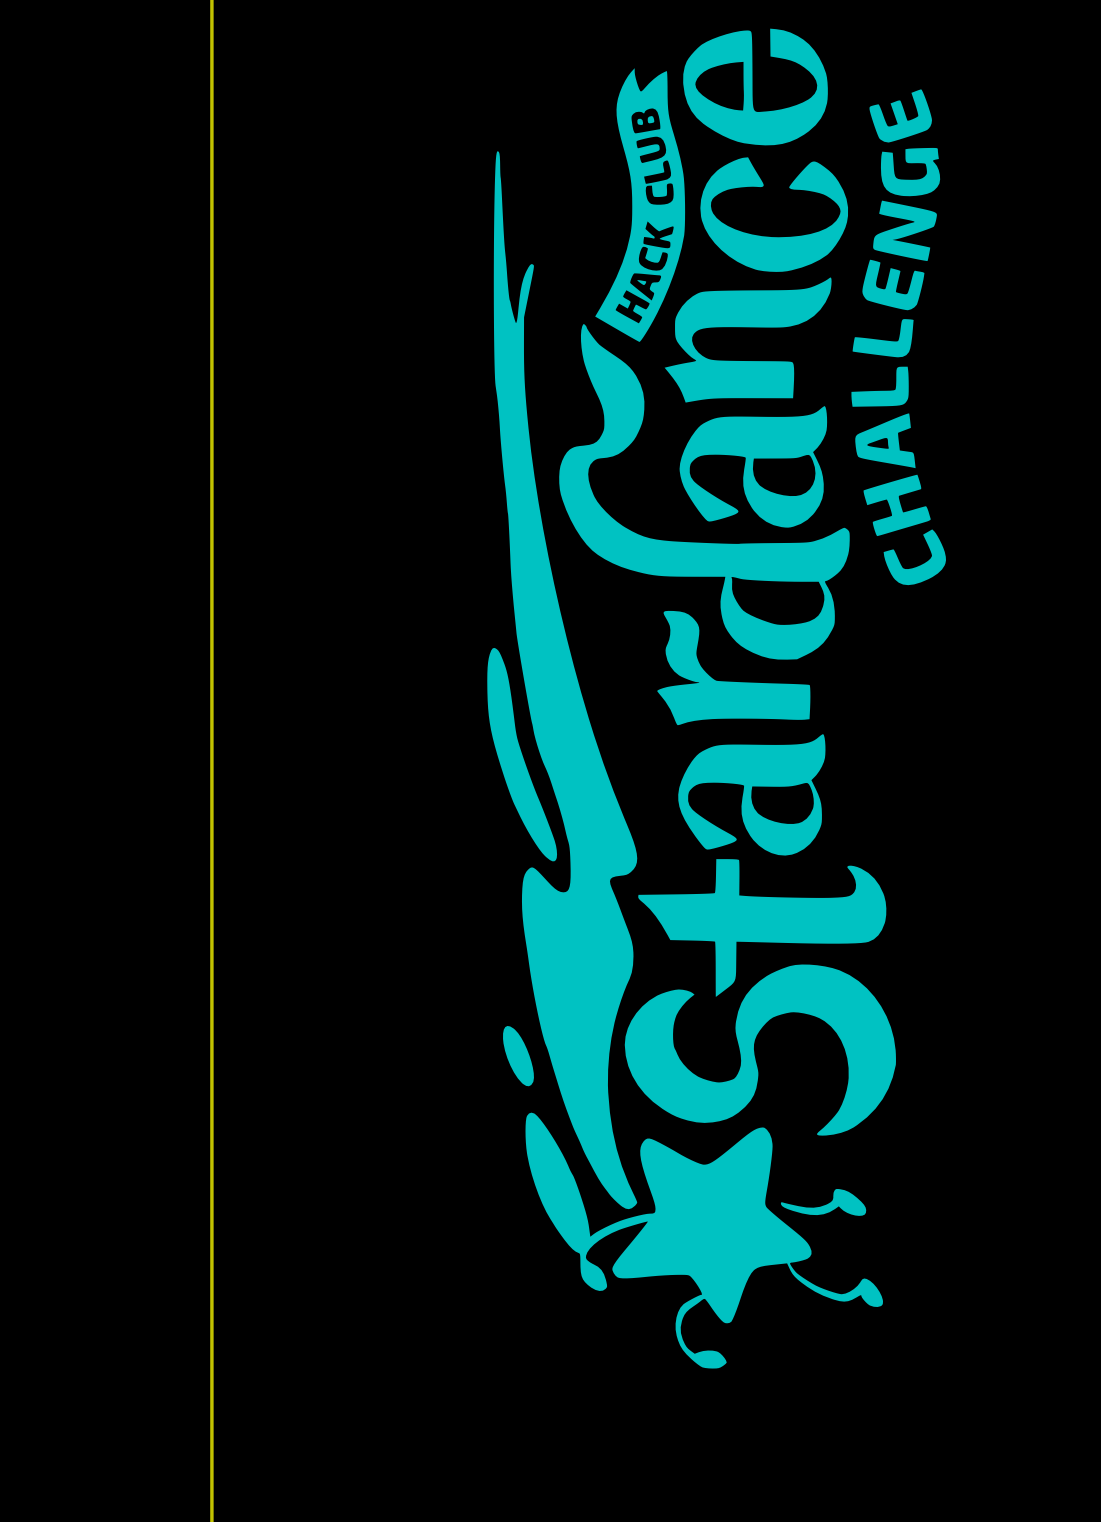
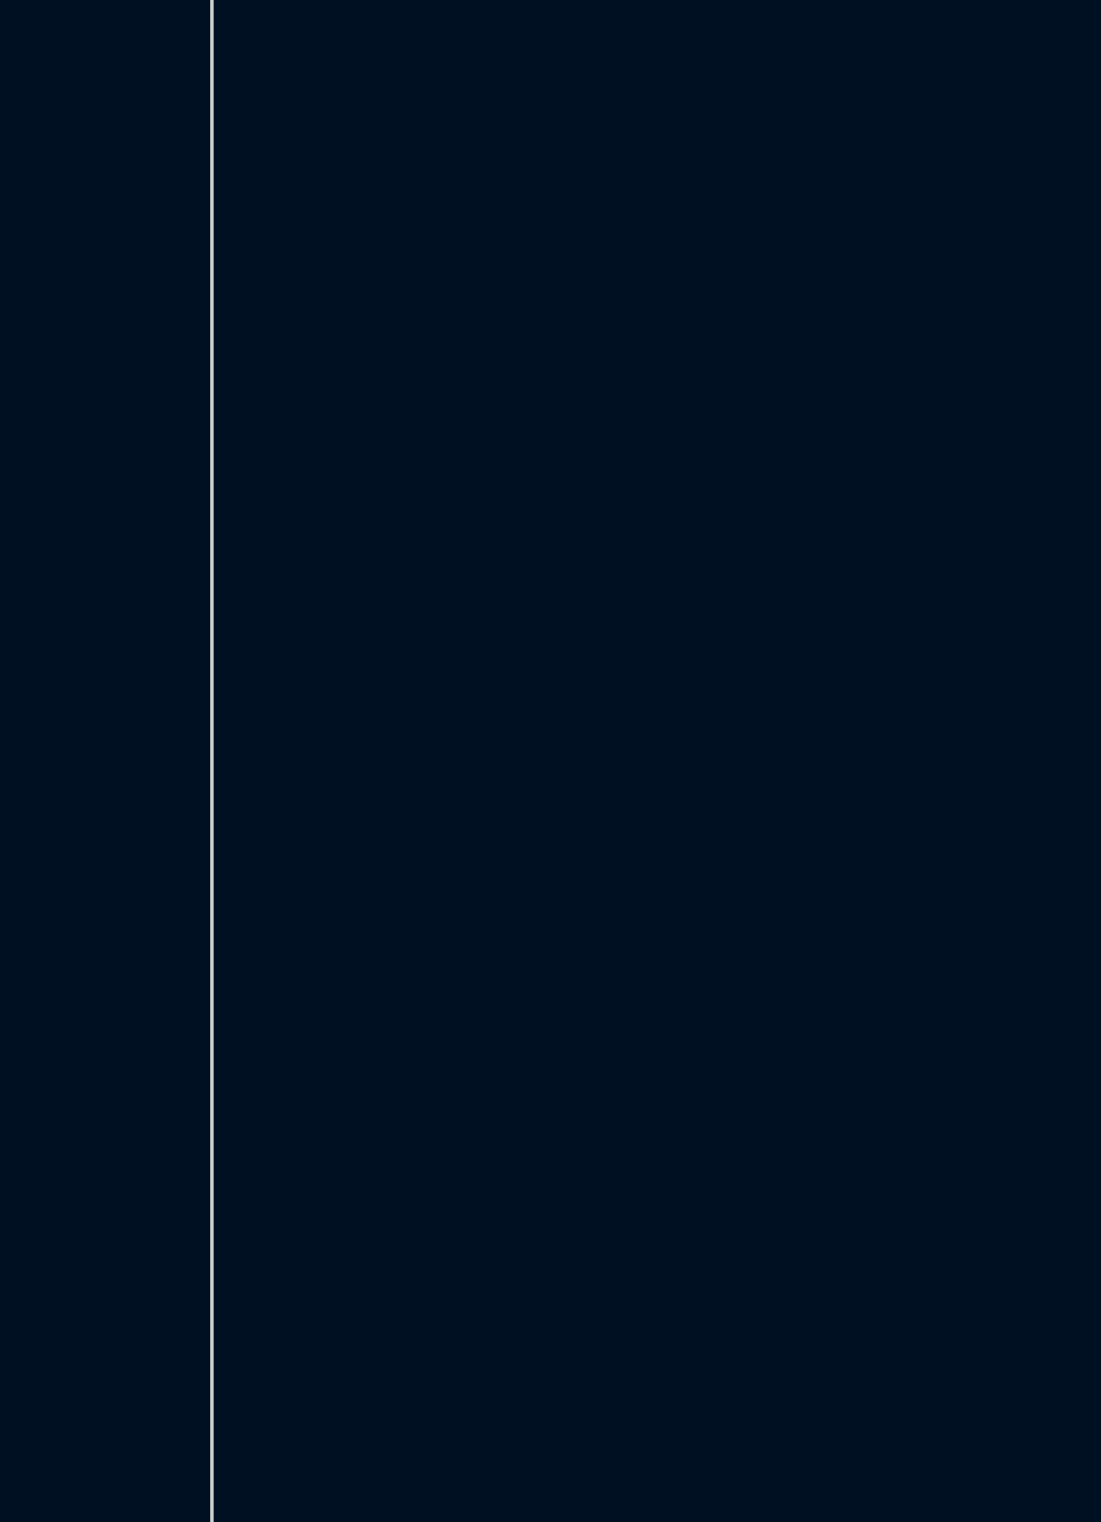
drawing: [487, 28, 947, 1369] -> none

